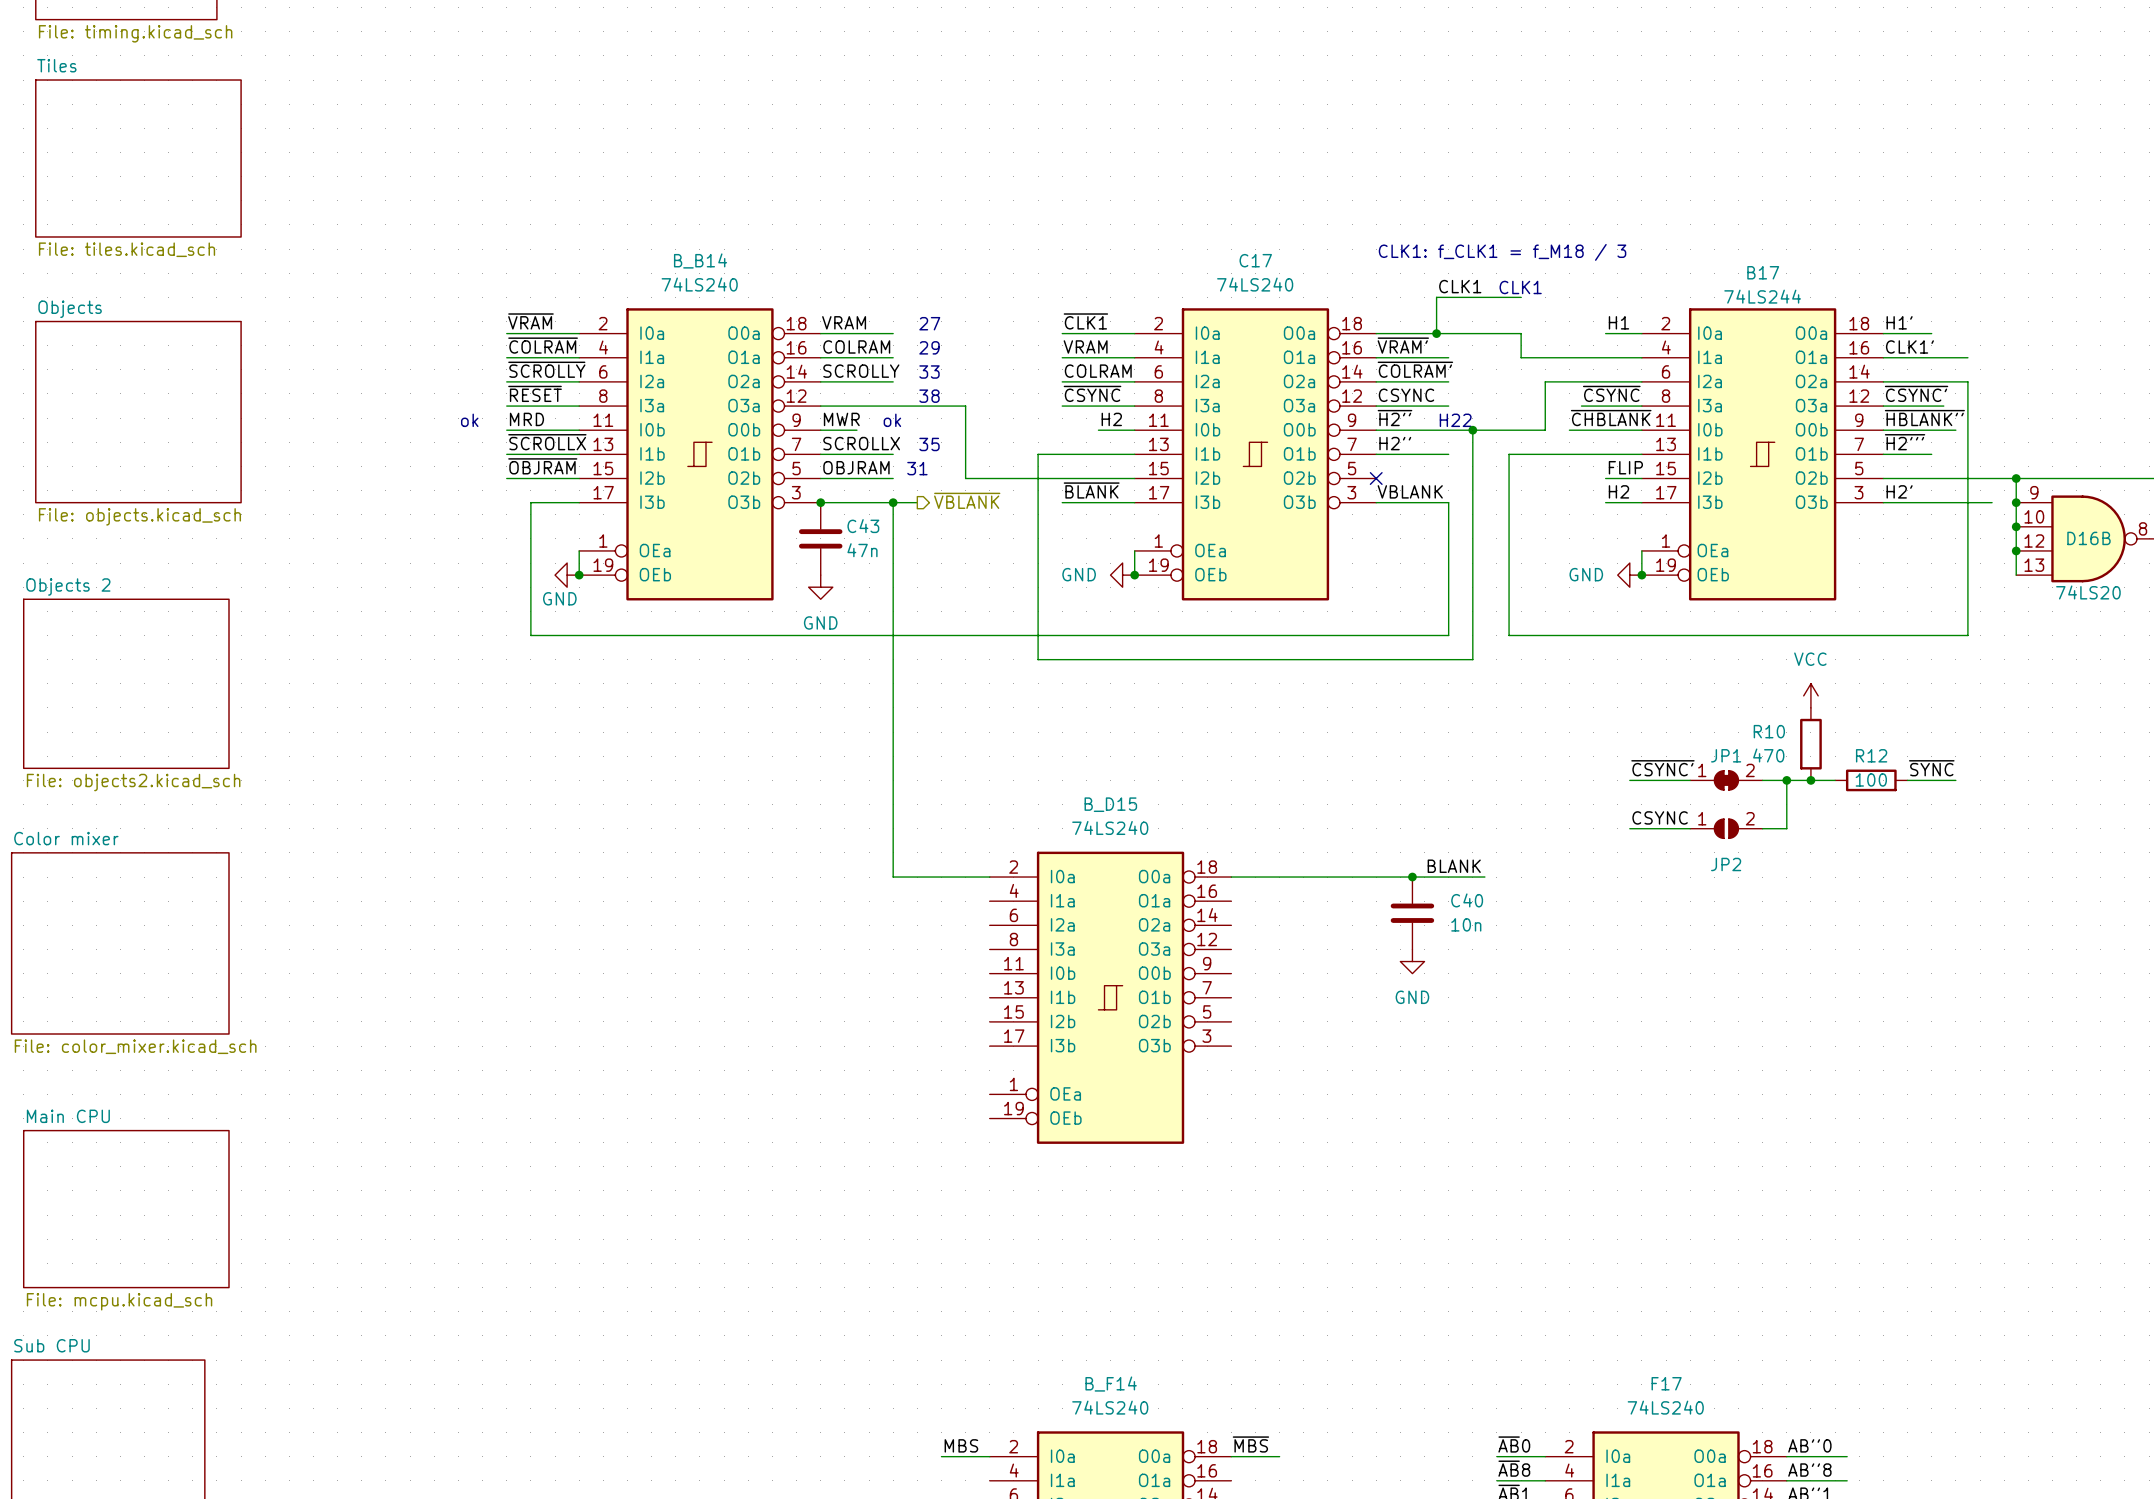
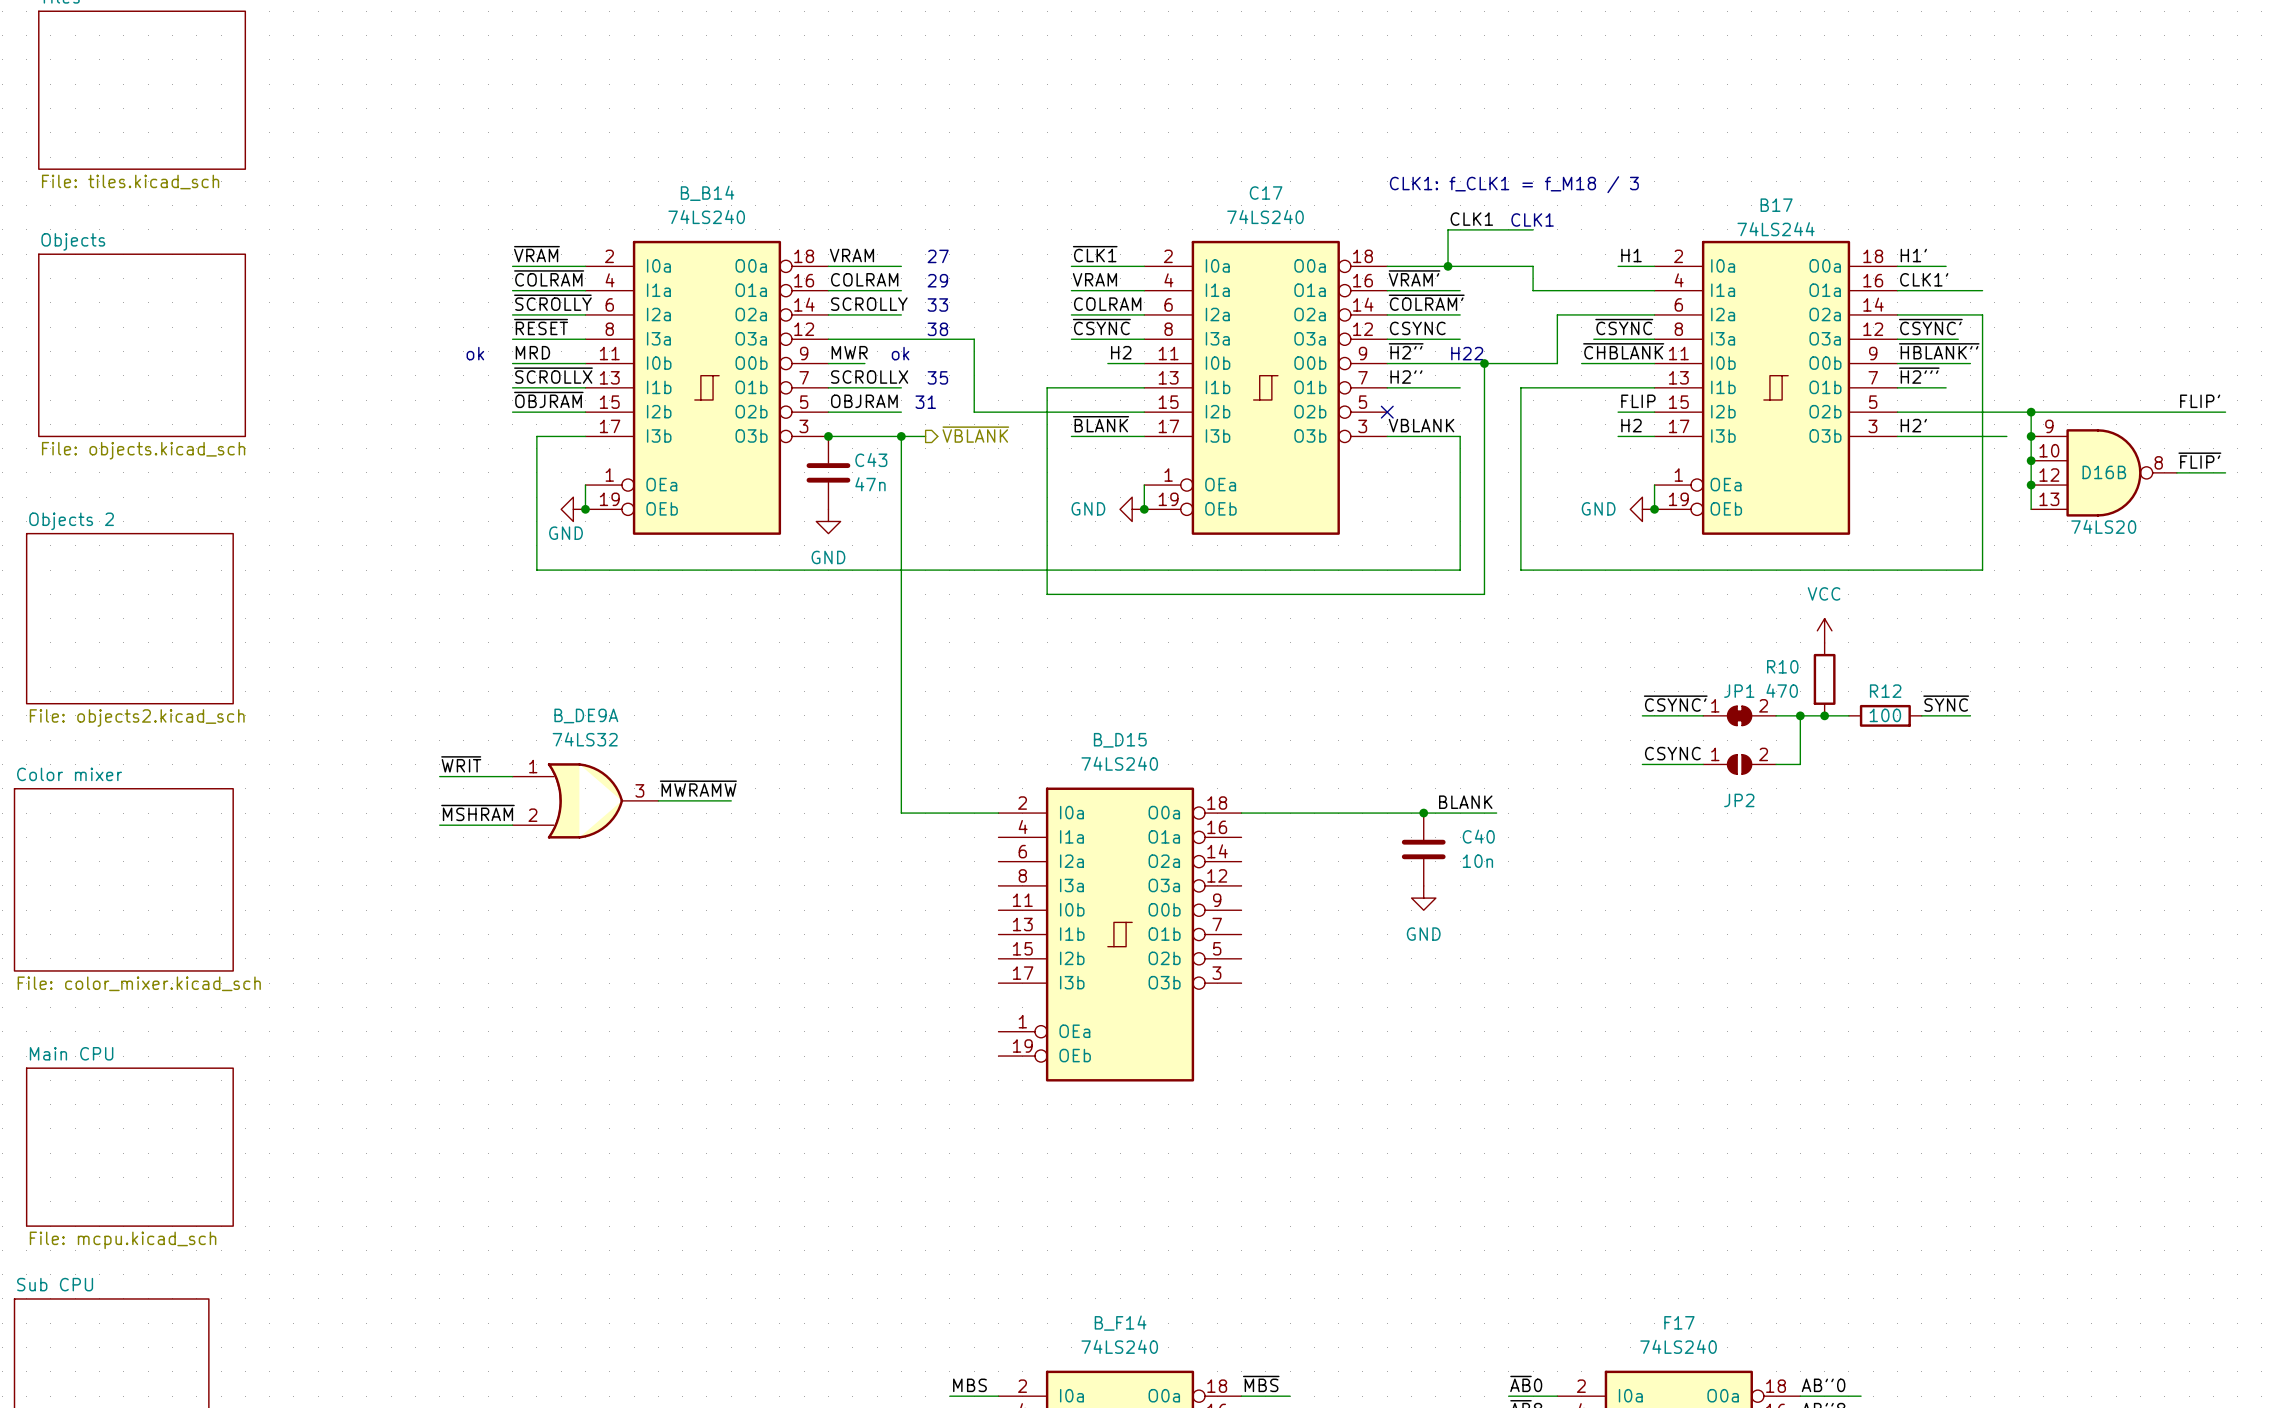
label: none -> ~{WRIT} (461, 764)
wire: none -> (439, 776) (512, 776)
label: none -> ~{MWRAMW} (698, 788)
B_DE9A: none -> 74LS32 (585, 800)
wire: none -> (658, 800) (731, 800)
label: none -> ~{MSHRAM} (477, 812)
wire: none -> (439, 825) (512, 825)

